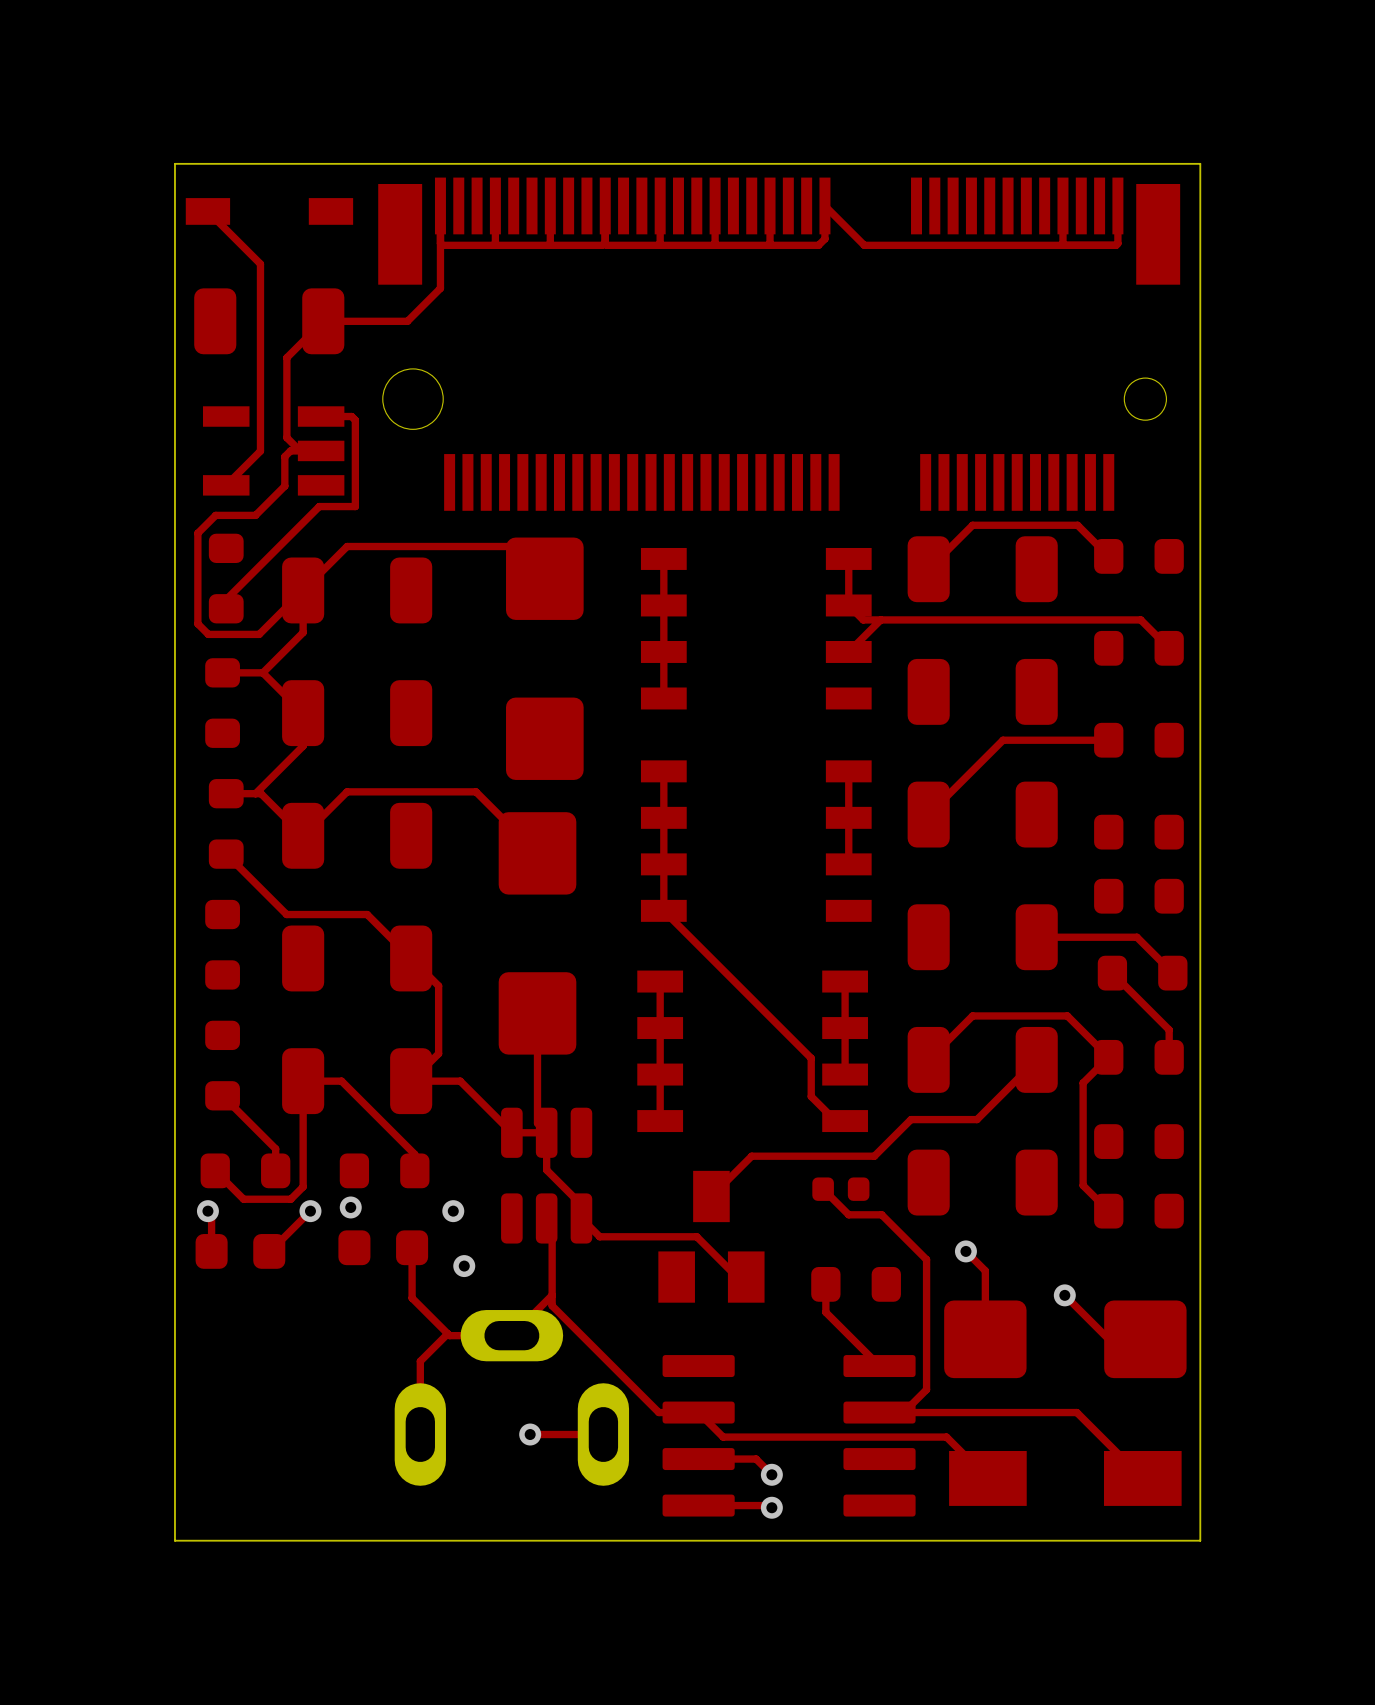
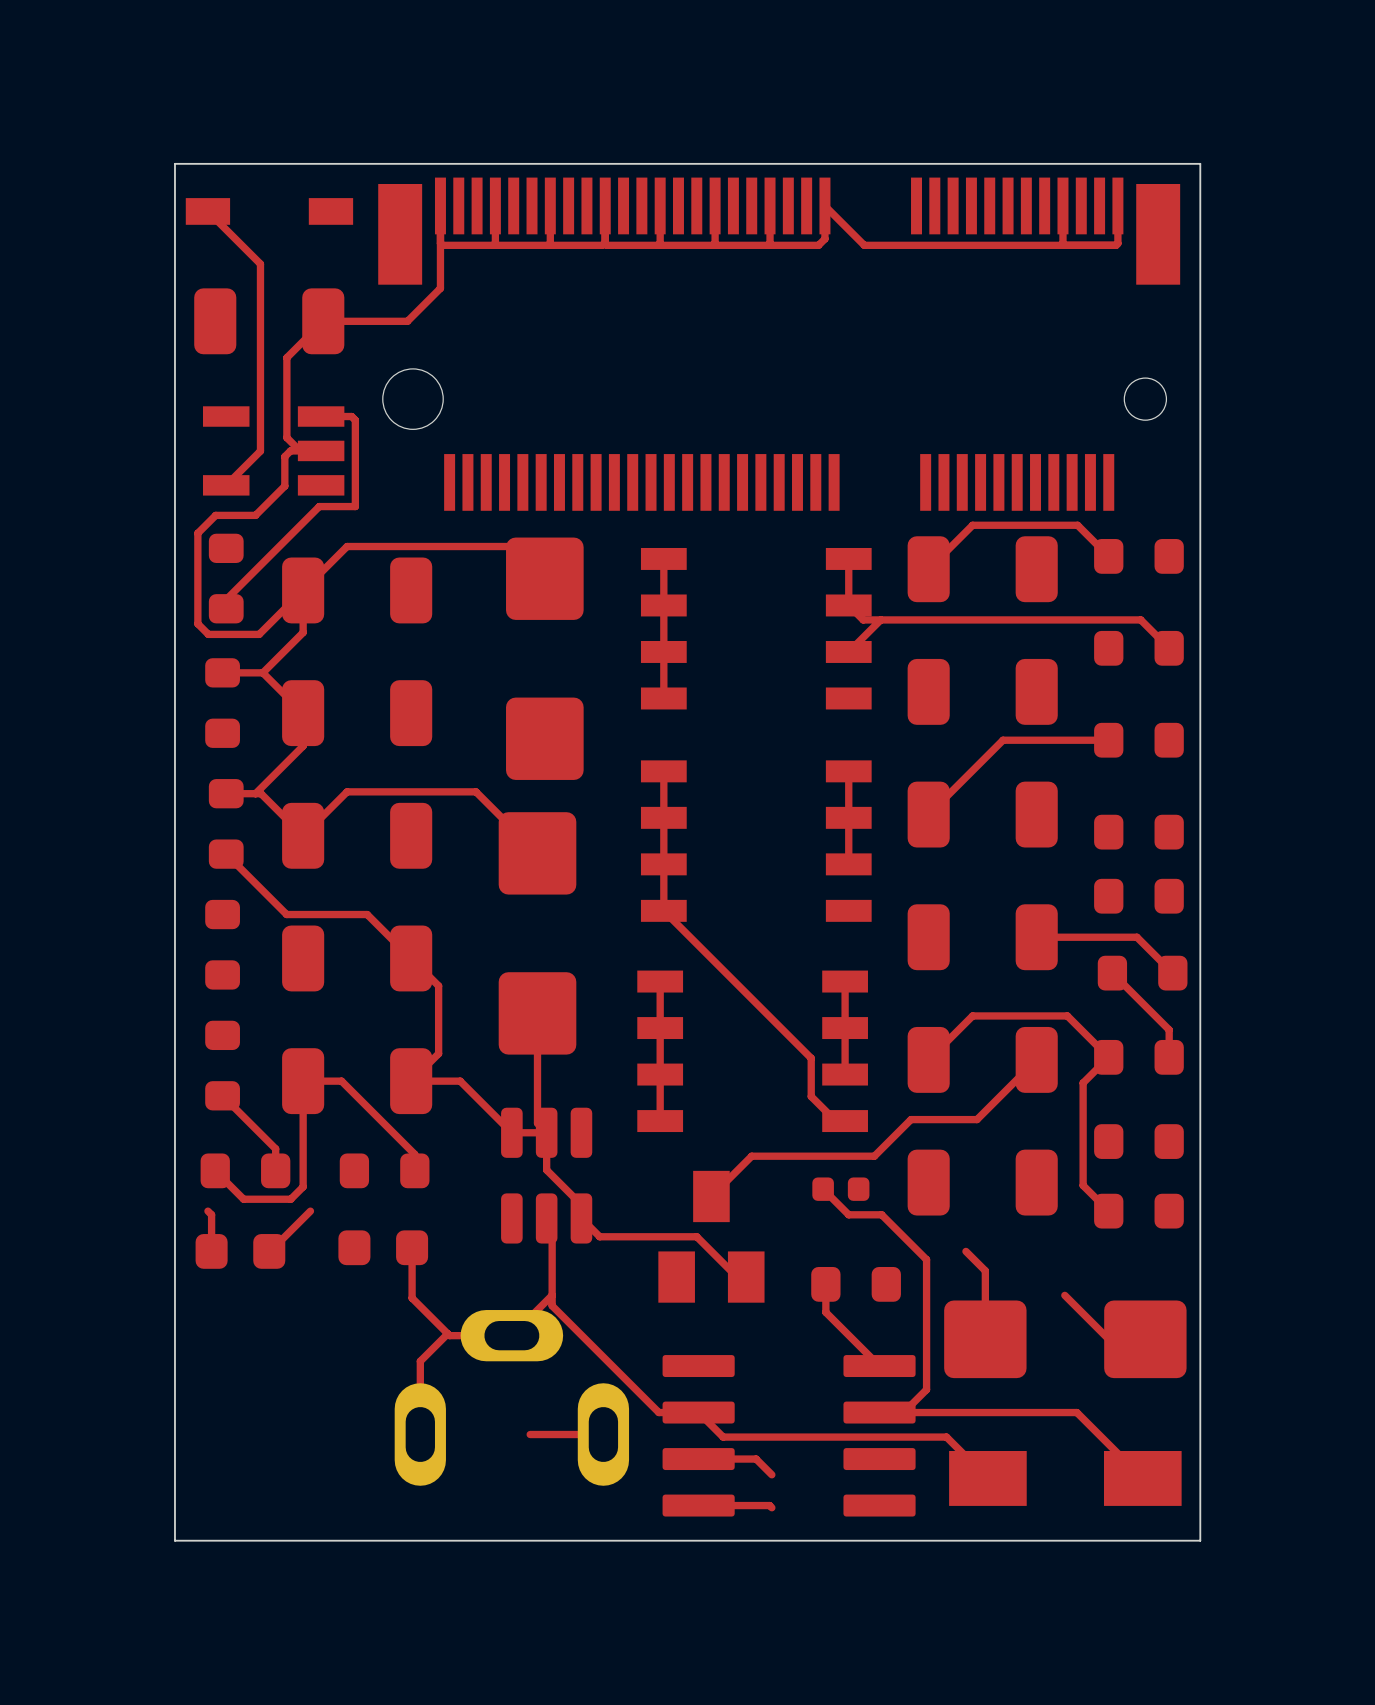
via: (350, 1207) -> none
via: (207, 1211) -> none
via: (310, 1211) -> none
via: (453, 1211) -> none
via: (965, 1251) -> none
via: (464, 1266) -> none
via: (1064, 1295) -> none
via: (530, 1434) -> none
via: (771, 1474) -> none
via: (771, 1507) -> none

